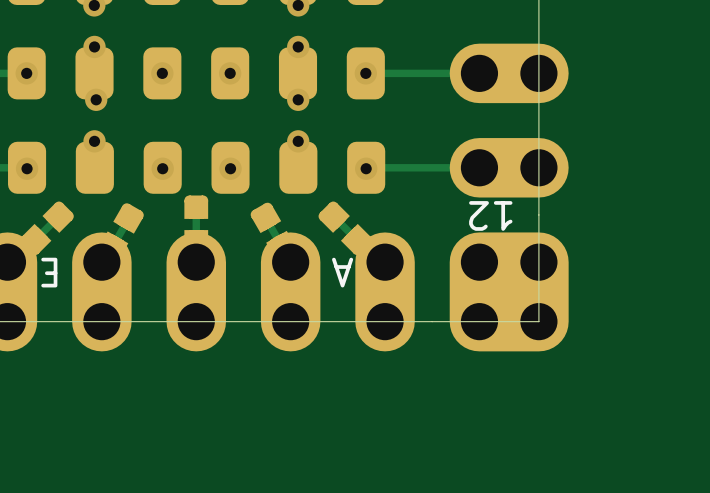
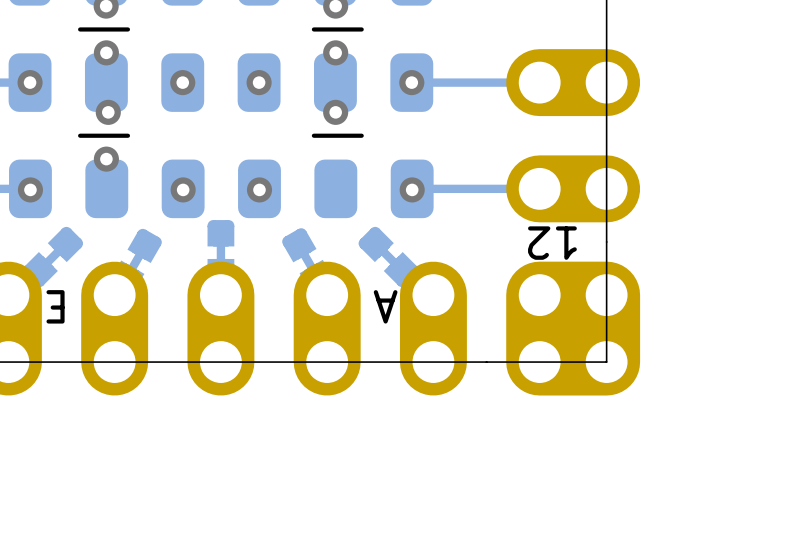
line: none -> (127, 29) (80, 29)
line: none -> (361, 29) (313, 29)
line: none -> (127, 135) (80, 135)
line: none -> (361, 135) (313, 135)
via: (298, 141) -> none

